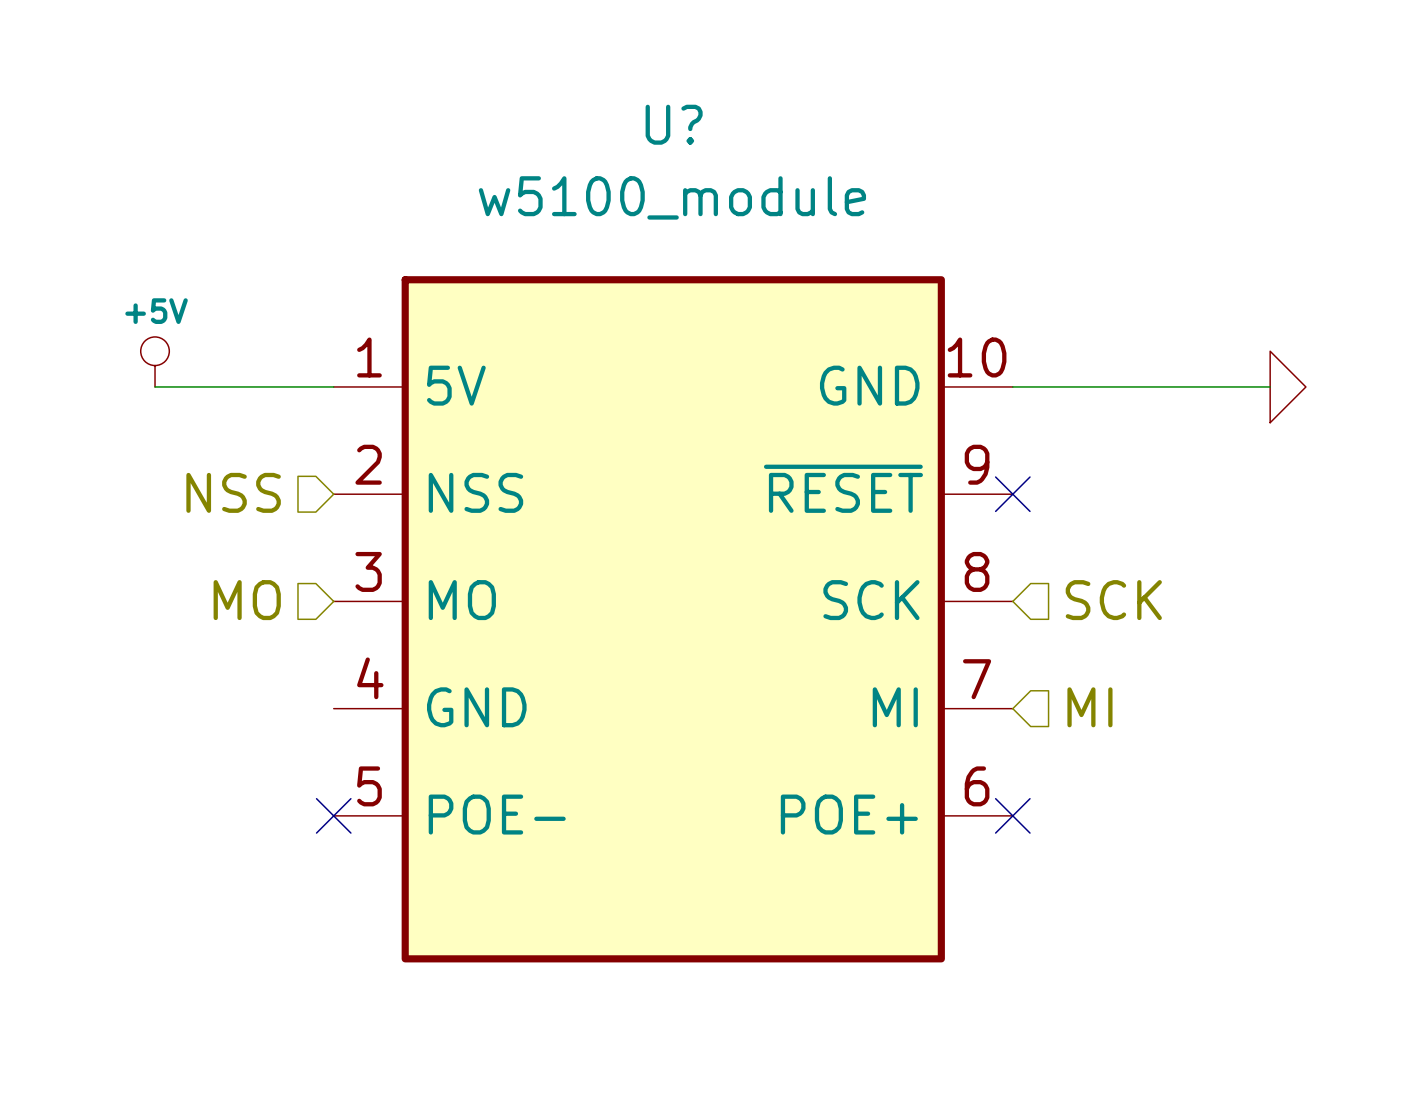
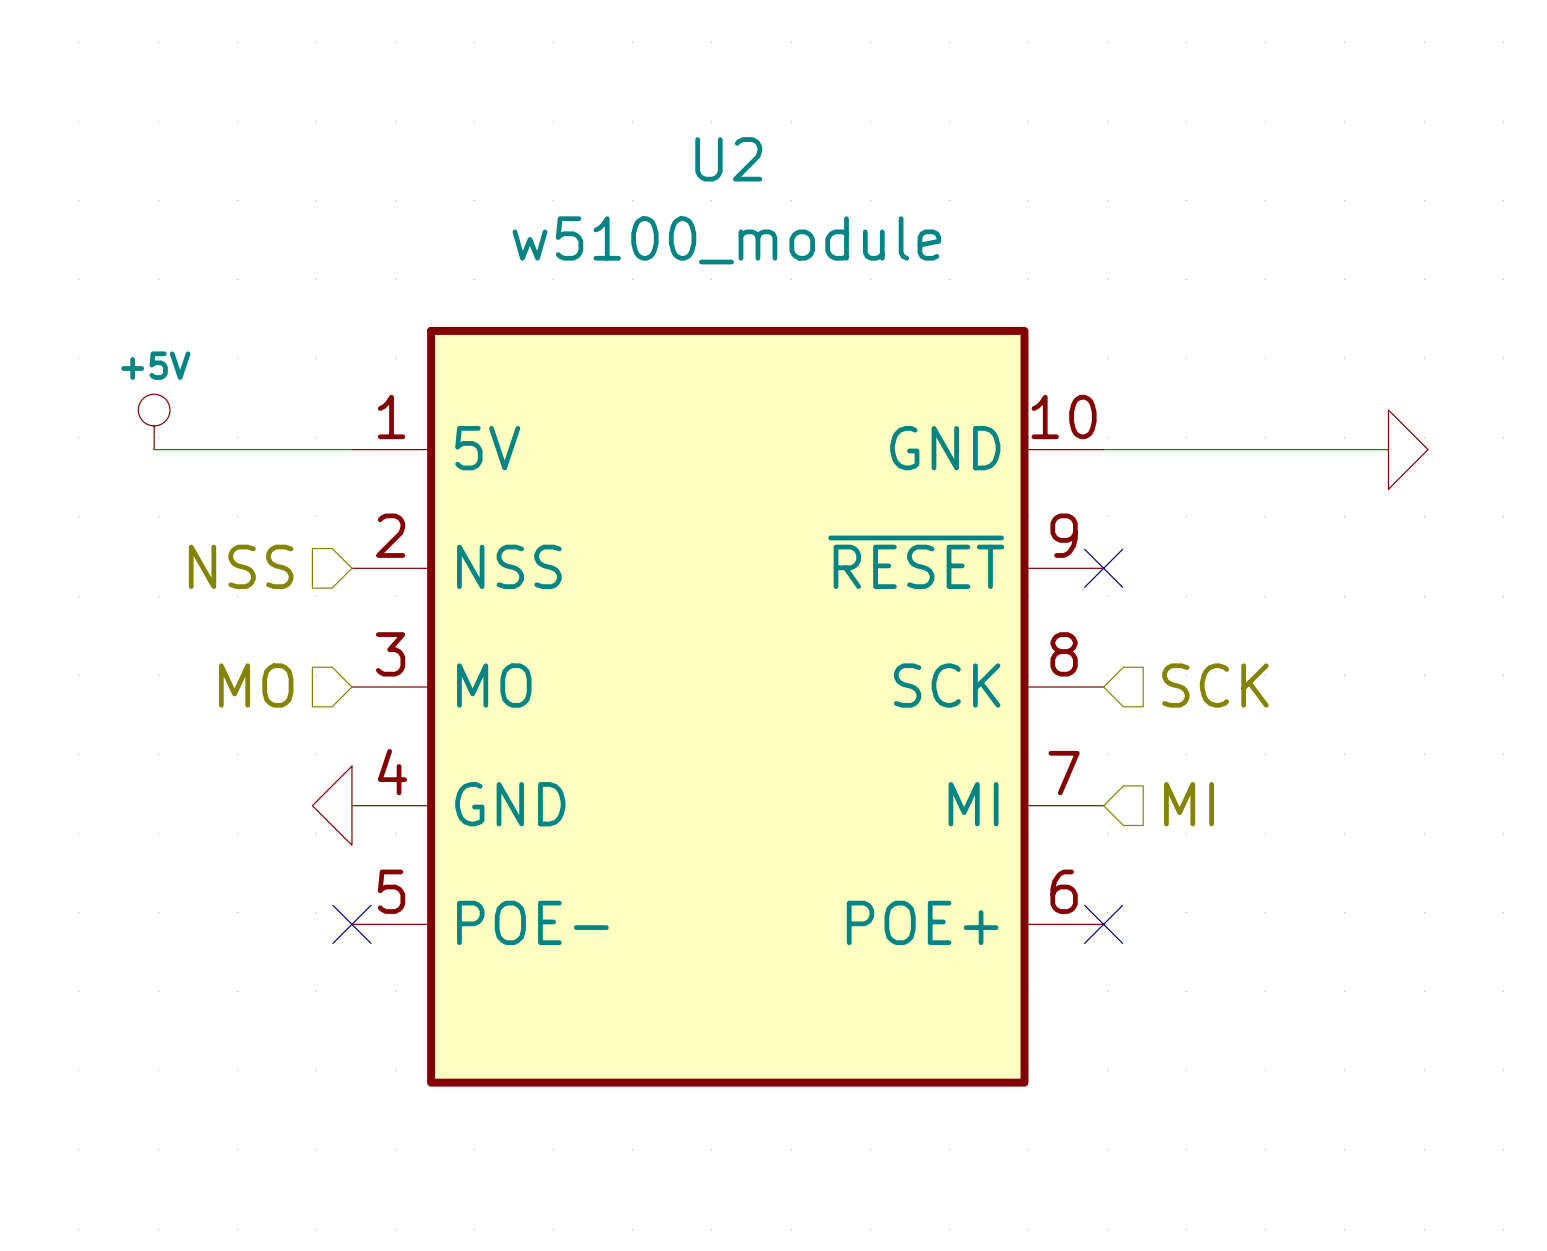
U? name: U? (674, 124) -> U2 (728, 159)
power symbol: none -> (332, 805)

